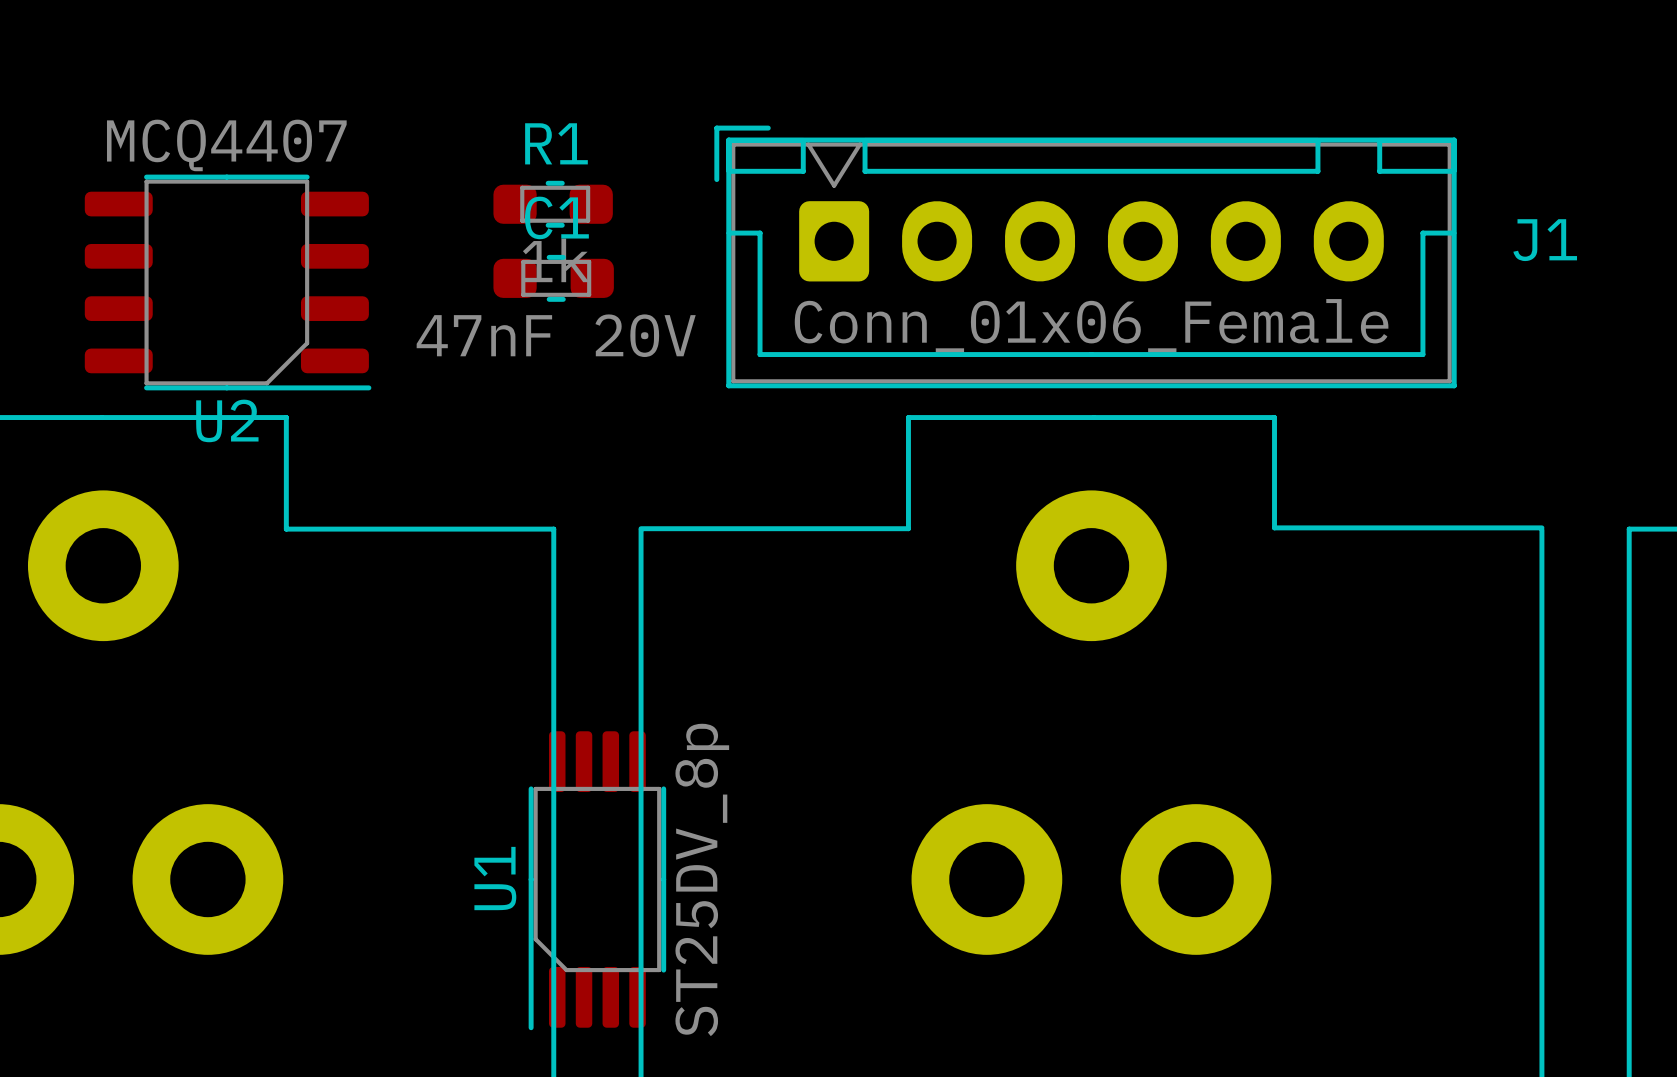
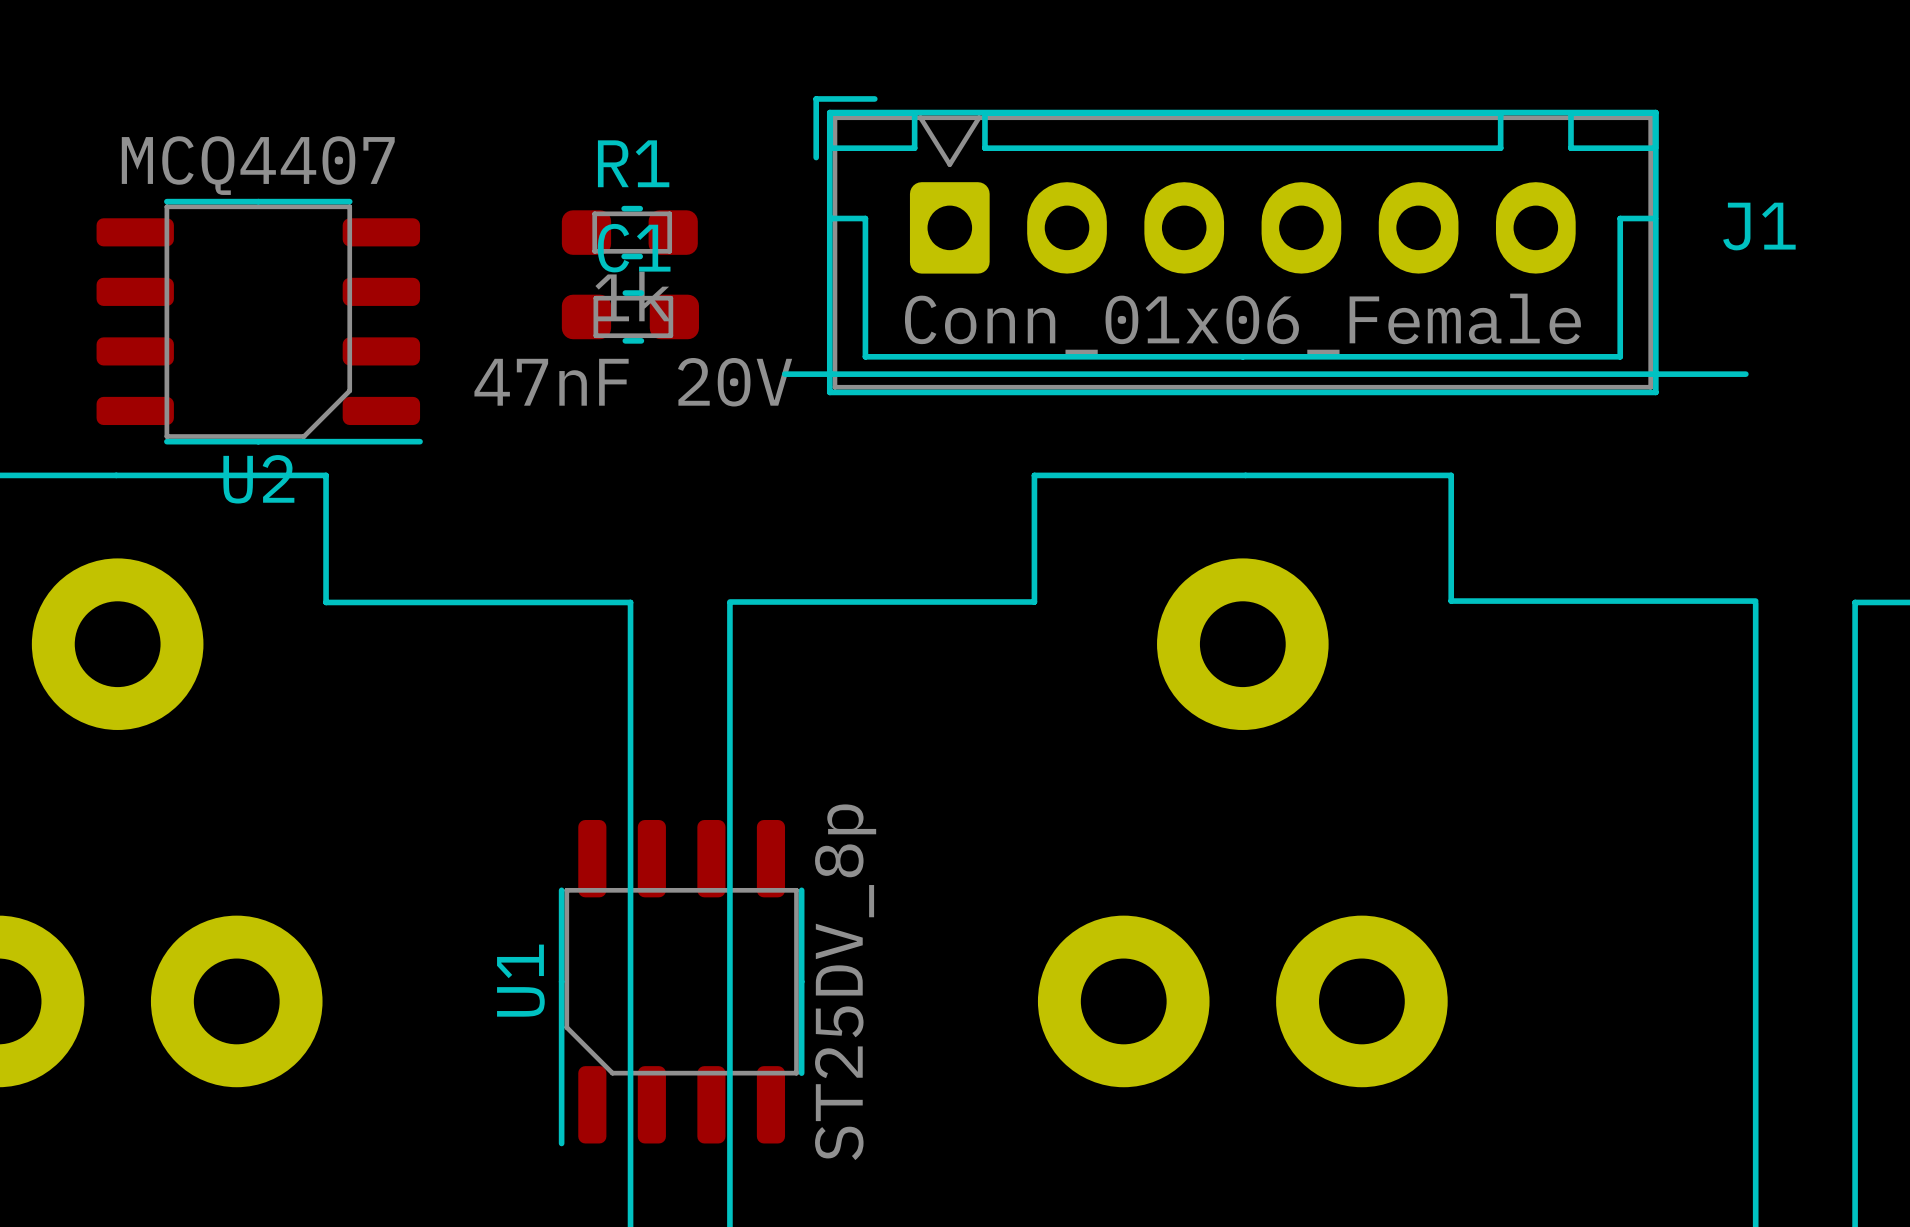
J1 position: (1085, 256) -> (1236, 245)
line: none -> (784, 374) (1745, 374)
U1 footprint: [528, 731, 667, 1031] -> [558, 820, 805, 1147]

